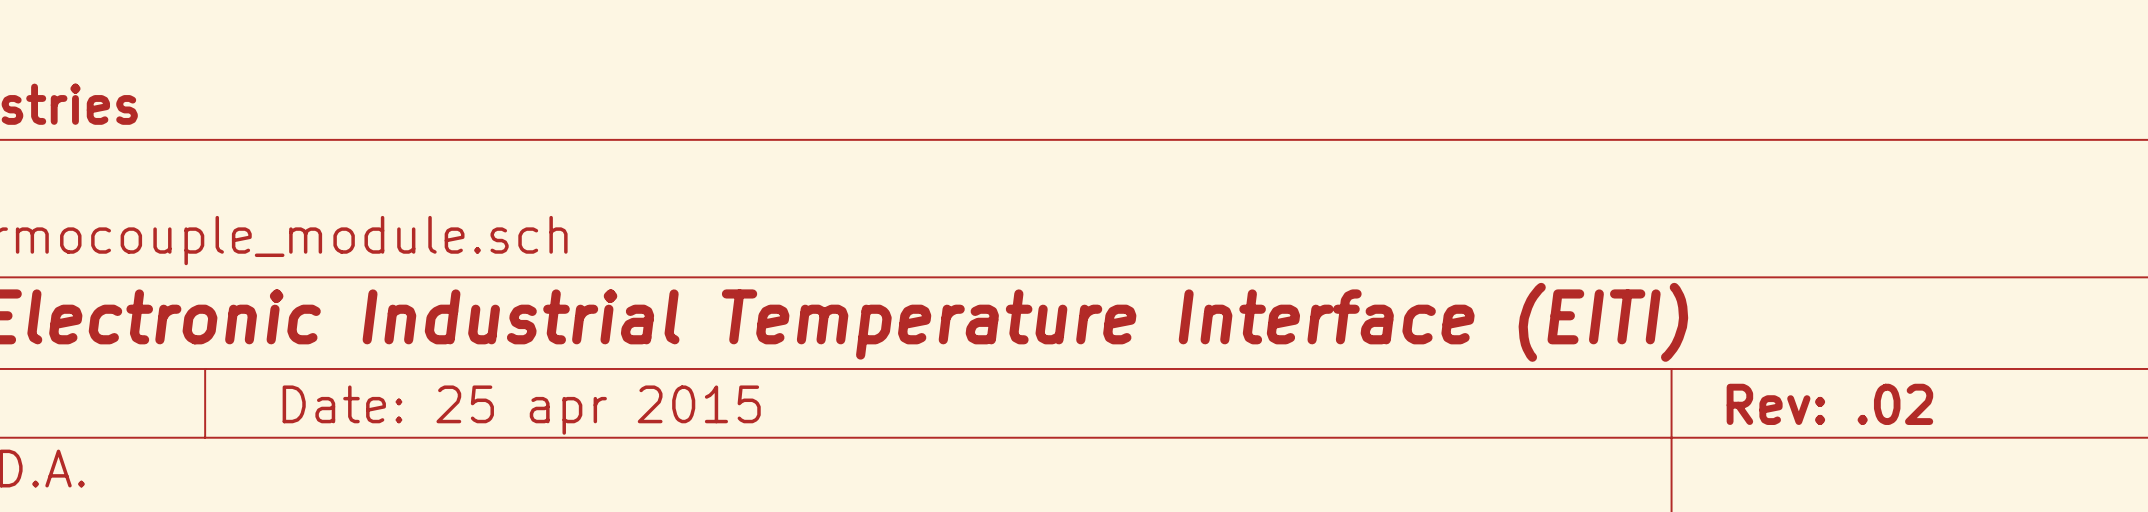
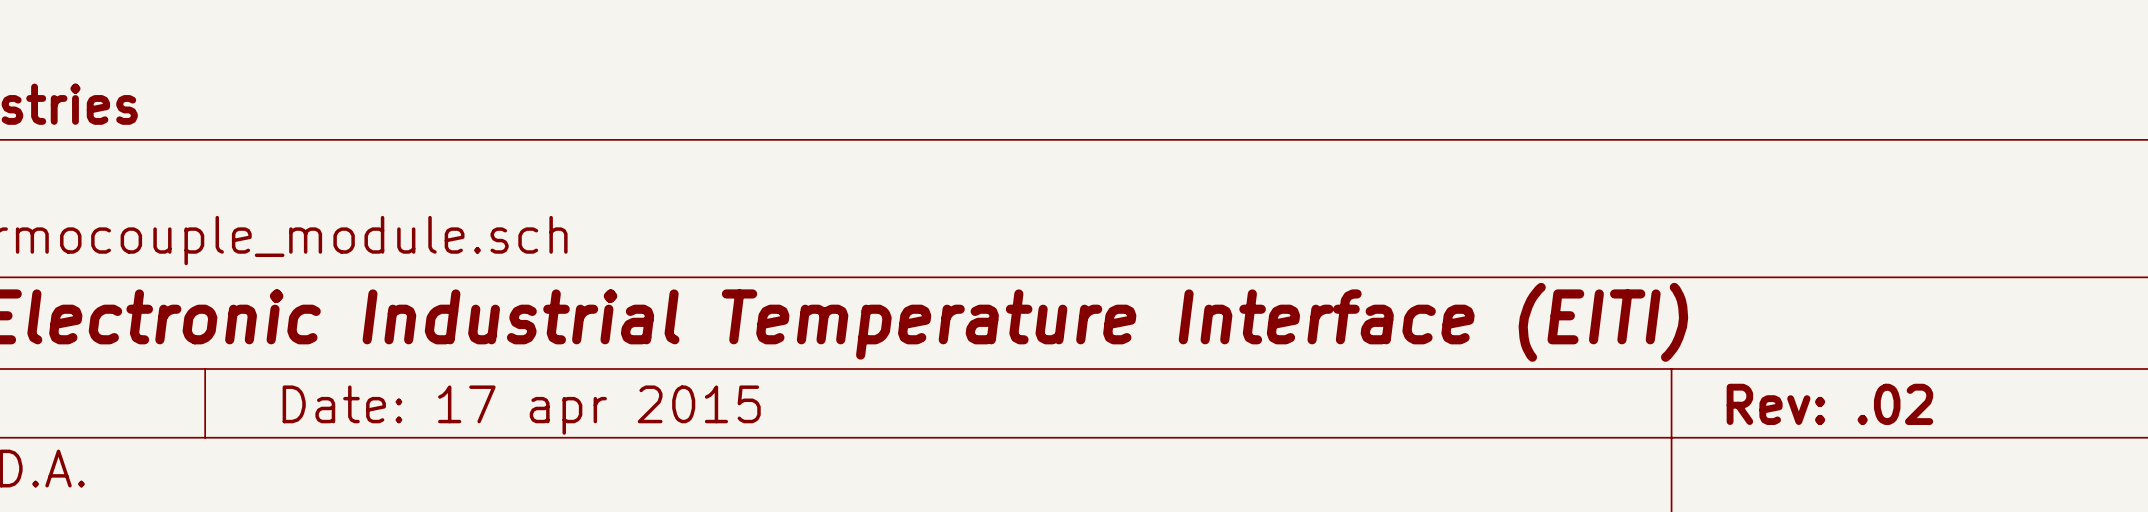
title block: Date: 25 apr 2015 (521, 410) -> Date: 17 apr 2015 (521, 410)

